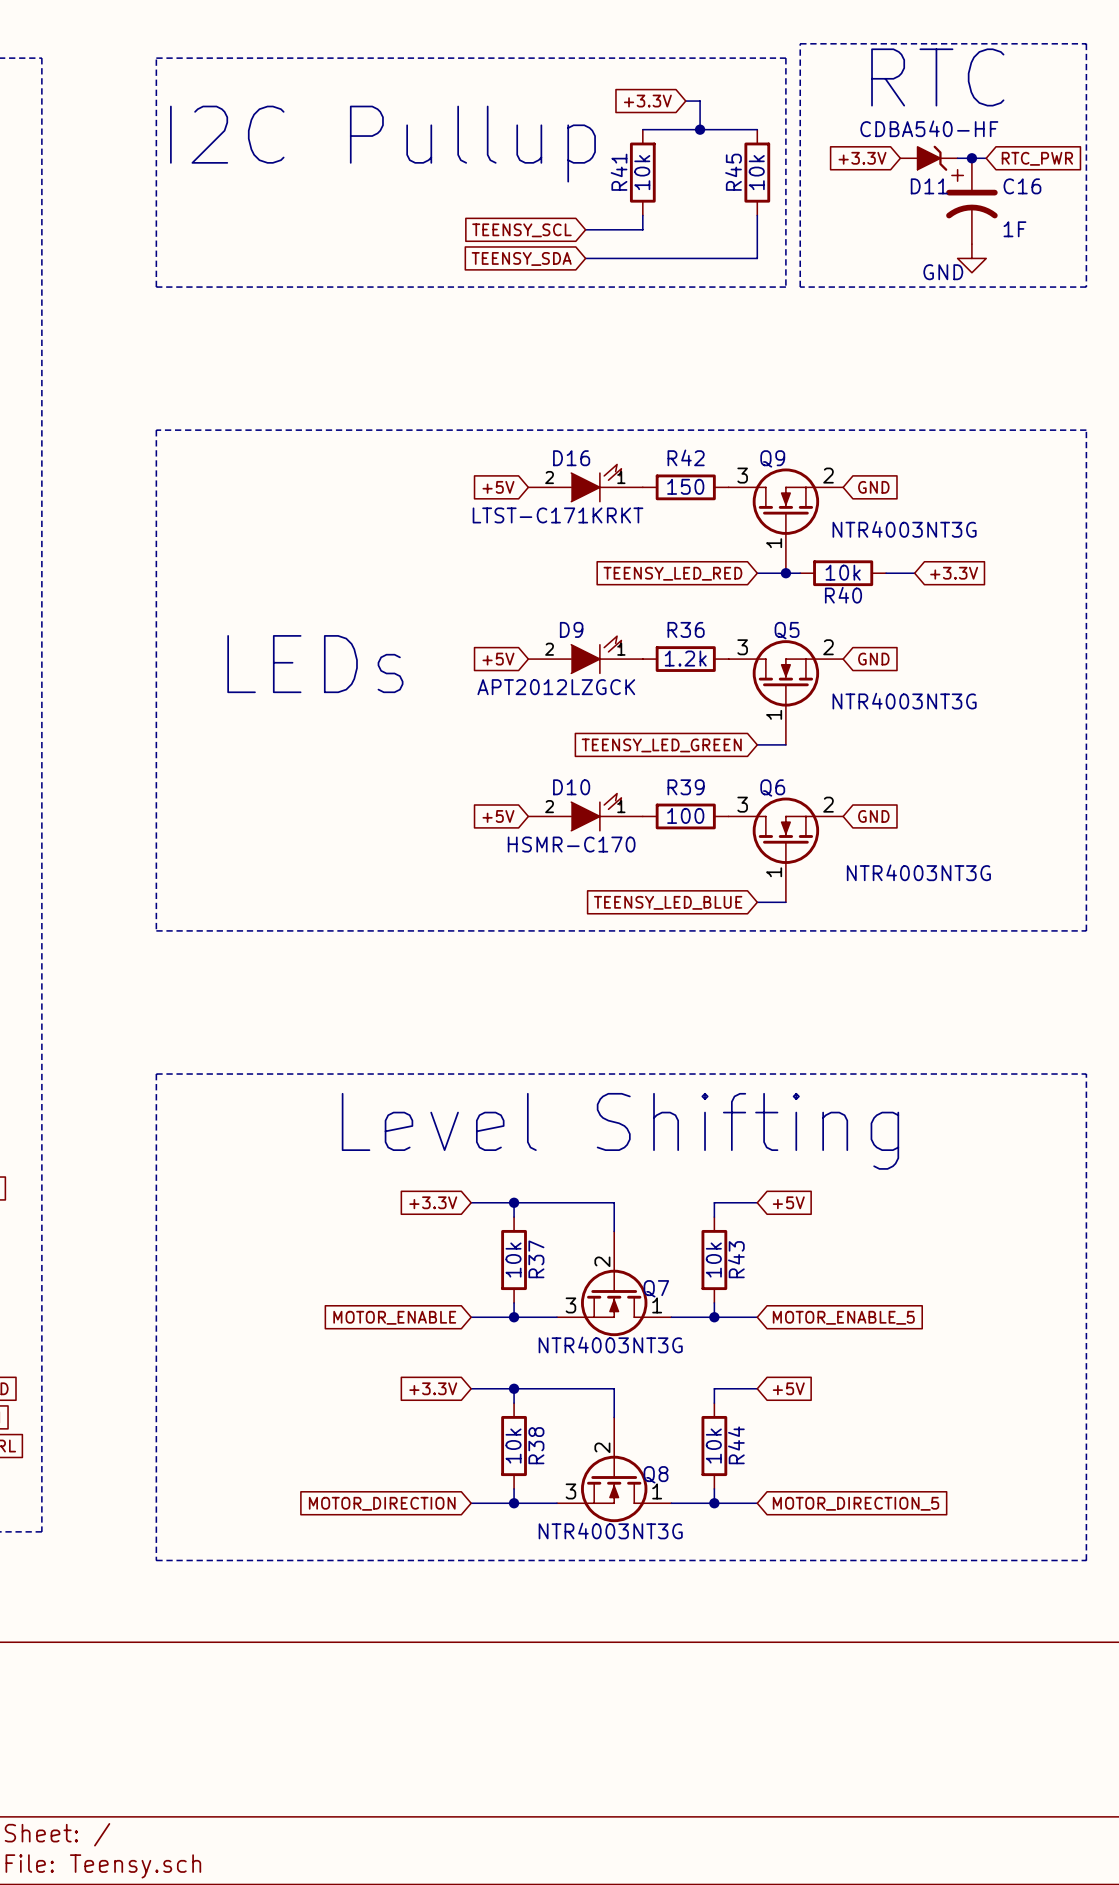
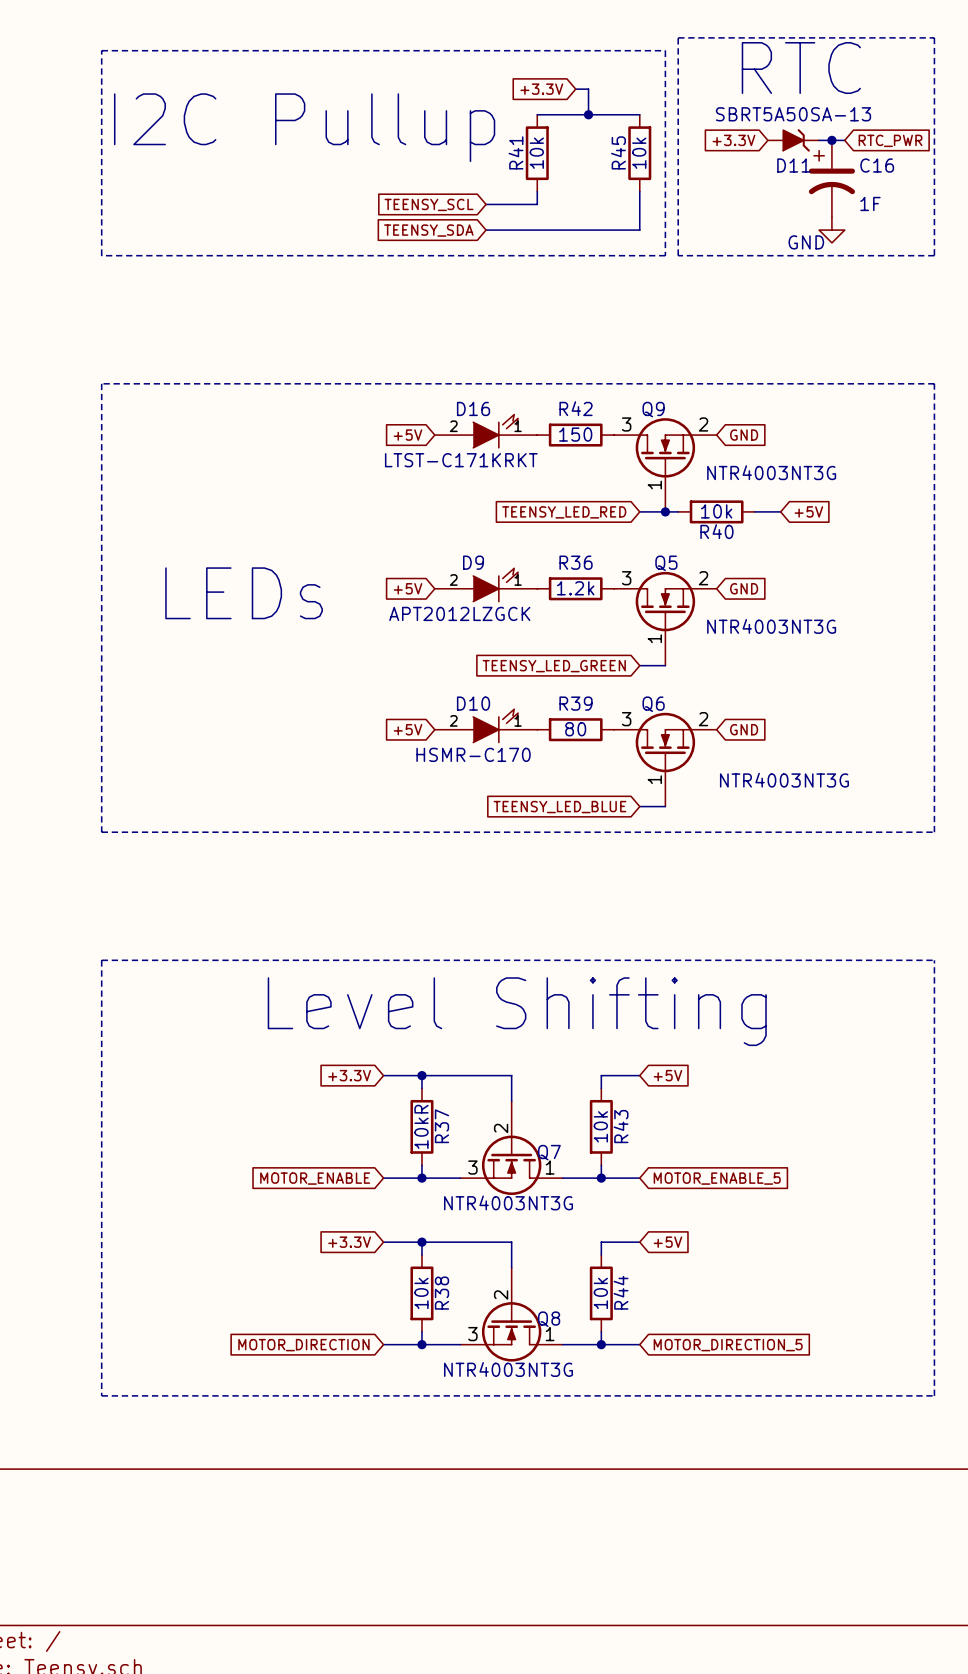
D11 value: CDBA540-HF (929, 128) -> SBRT5A50SA-13 (793, 114)
global label: +3.3V (954, 573) -> +5V (808, 511)
R39 value: 100 (685, 815) -> 80 (575, 729)
R37 value: 10k (513, 1260) -> 10kR (421, 1126)

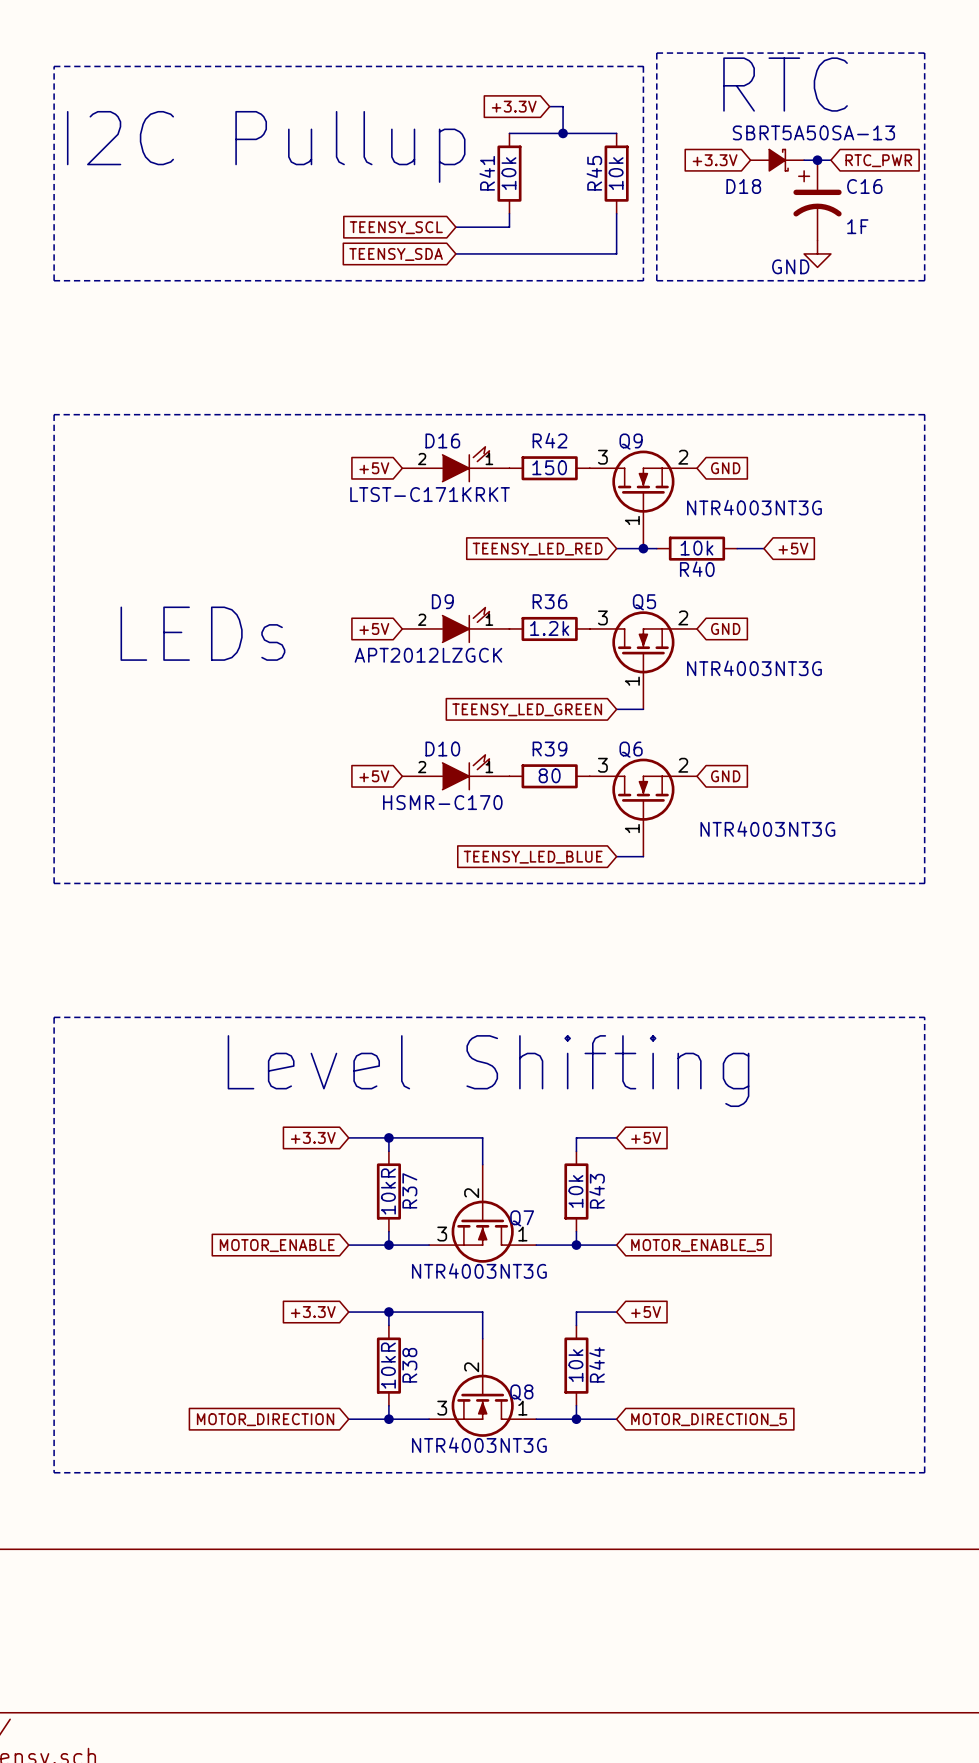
D11: SBRT5A50SA-13 (793, 140) -> none
D18: none -> SBRT5A50SA-13 (777, 160)
R38 value: 10k (421, 1293) -> 10kR (388, 1365)

